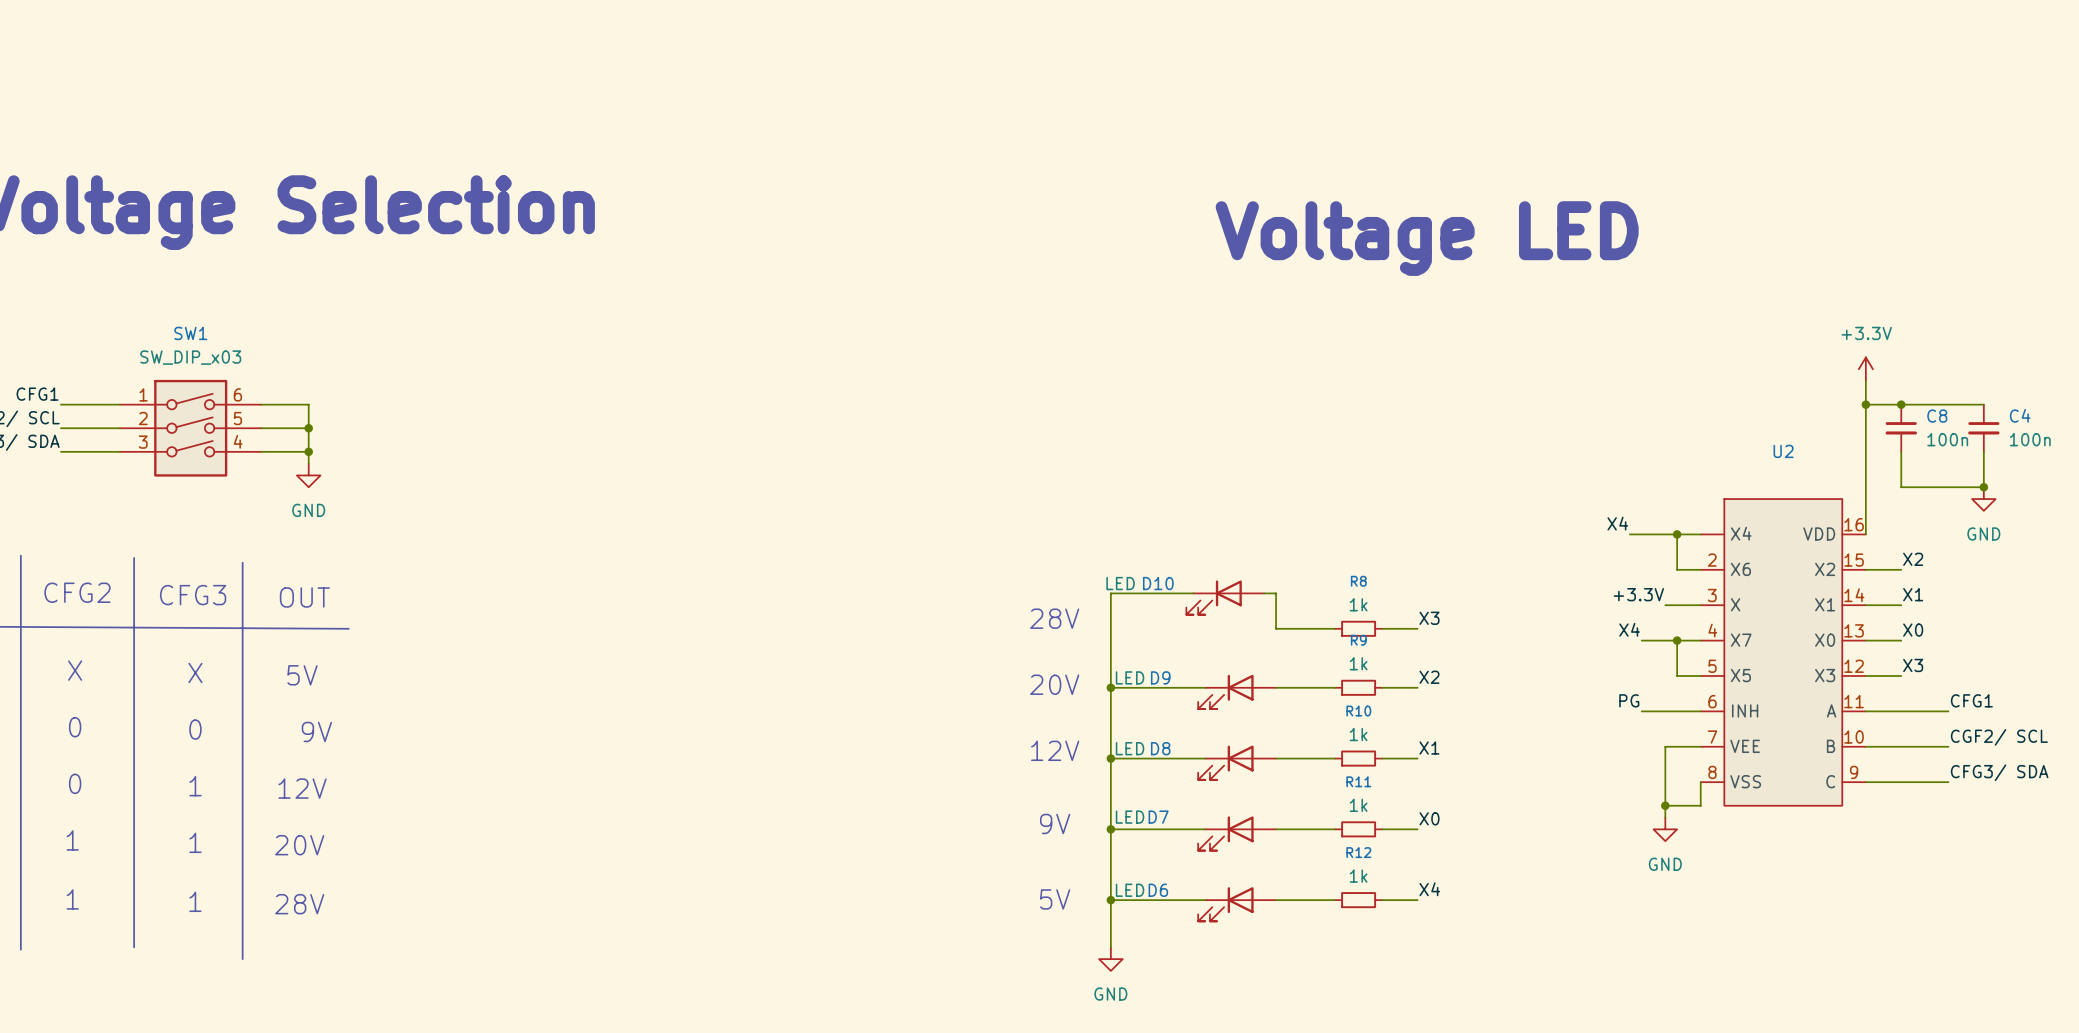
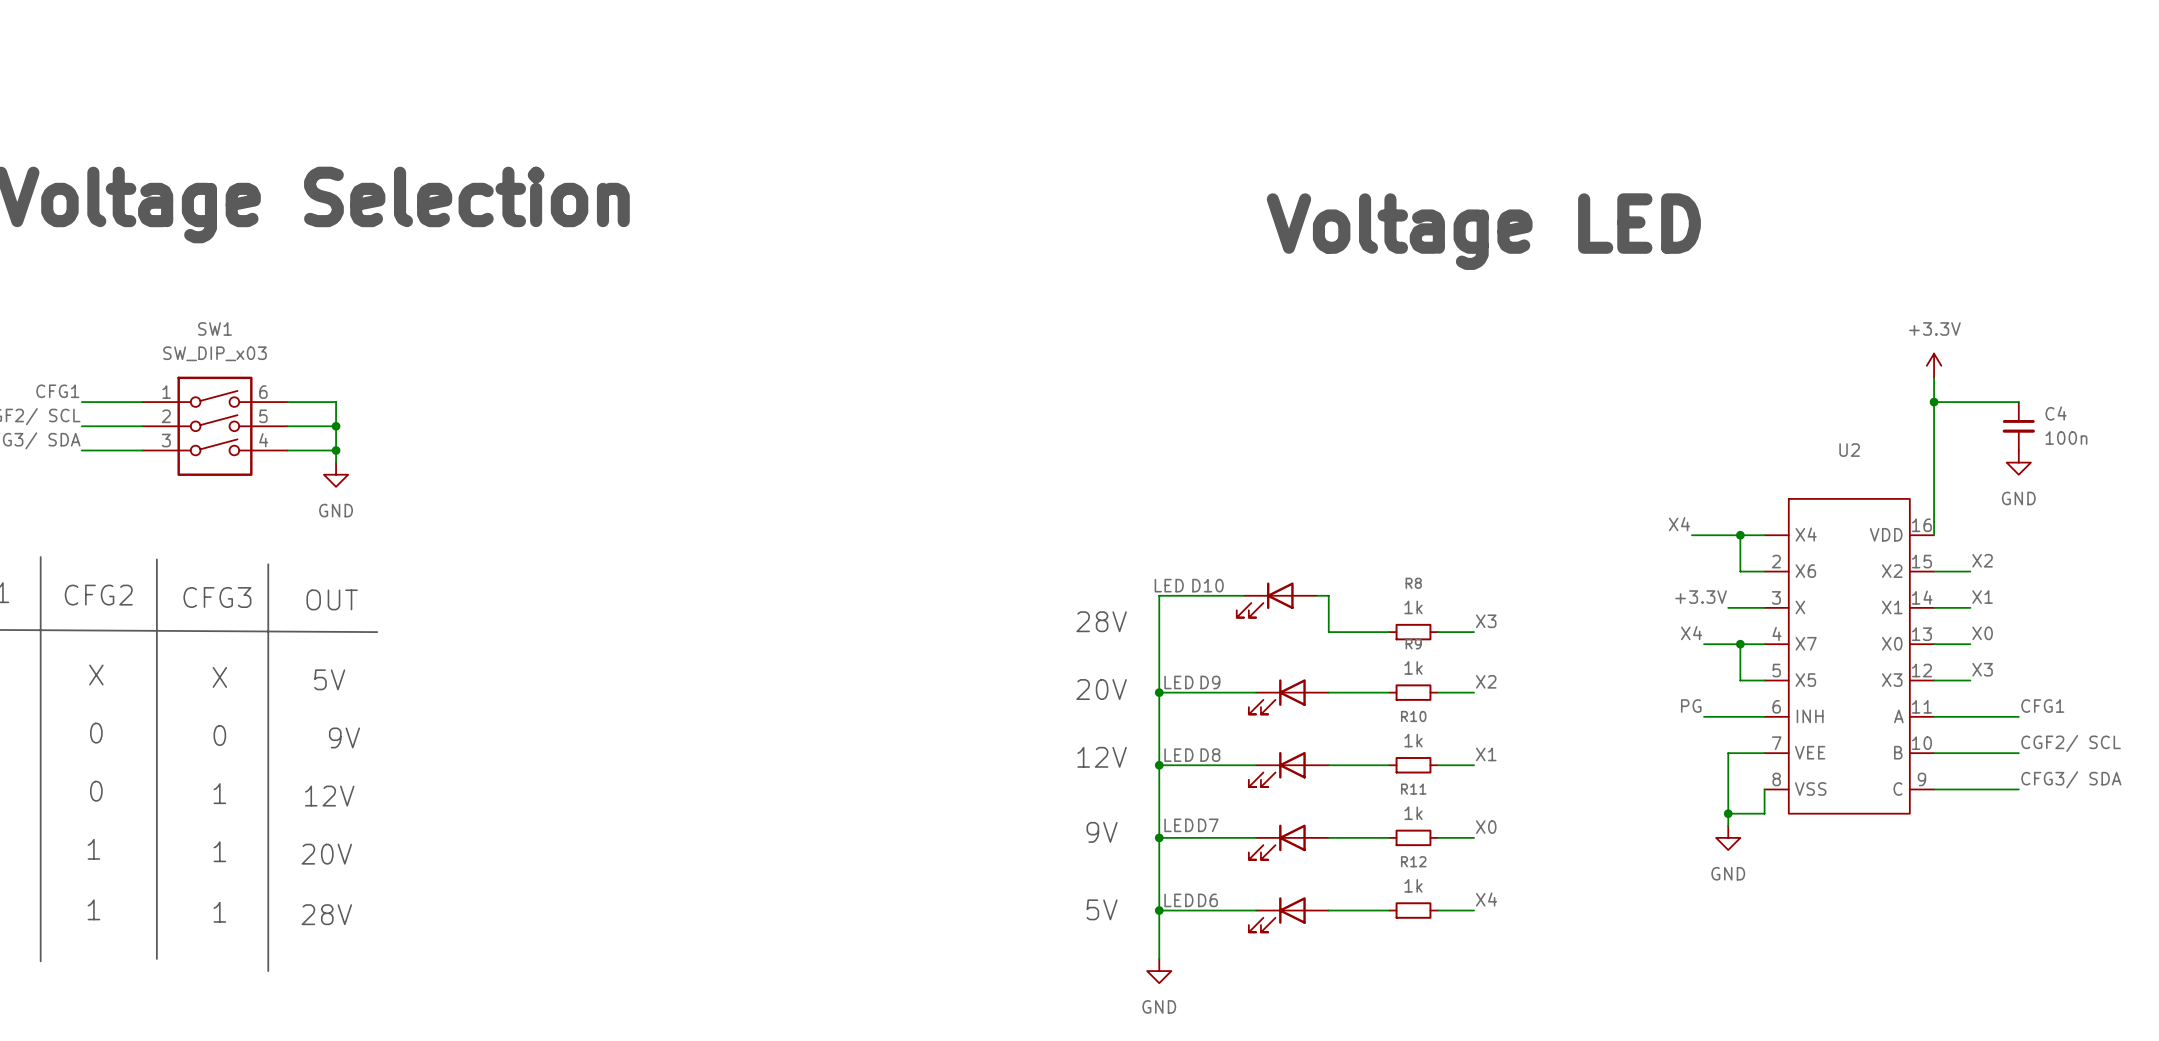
junction: (1901, 404) -> none
wire: (1948, 404) (1983, 404) -> none
C8: 100n (1901, 428) -> none
C4 position: (1983, 428) -> (2018, 426)
wire: (1901, 451) (1901, 487) (1983, 487) (1983, 451) -> none
junction: (1983, 487) -> none
power symbol position: GND (1983, 499) -> GND (2018, 462)

